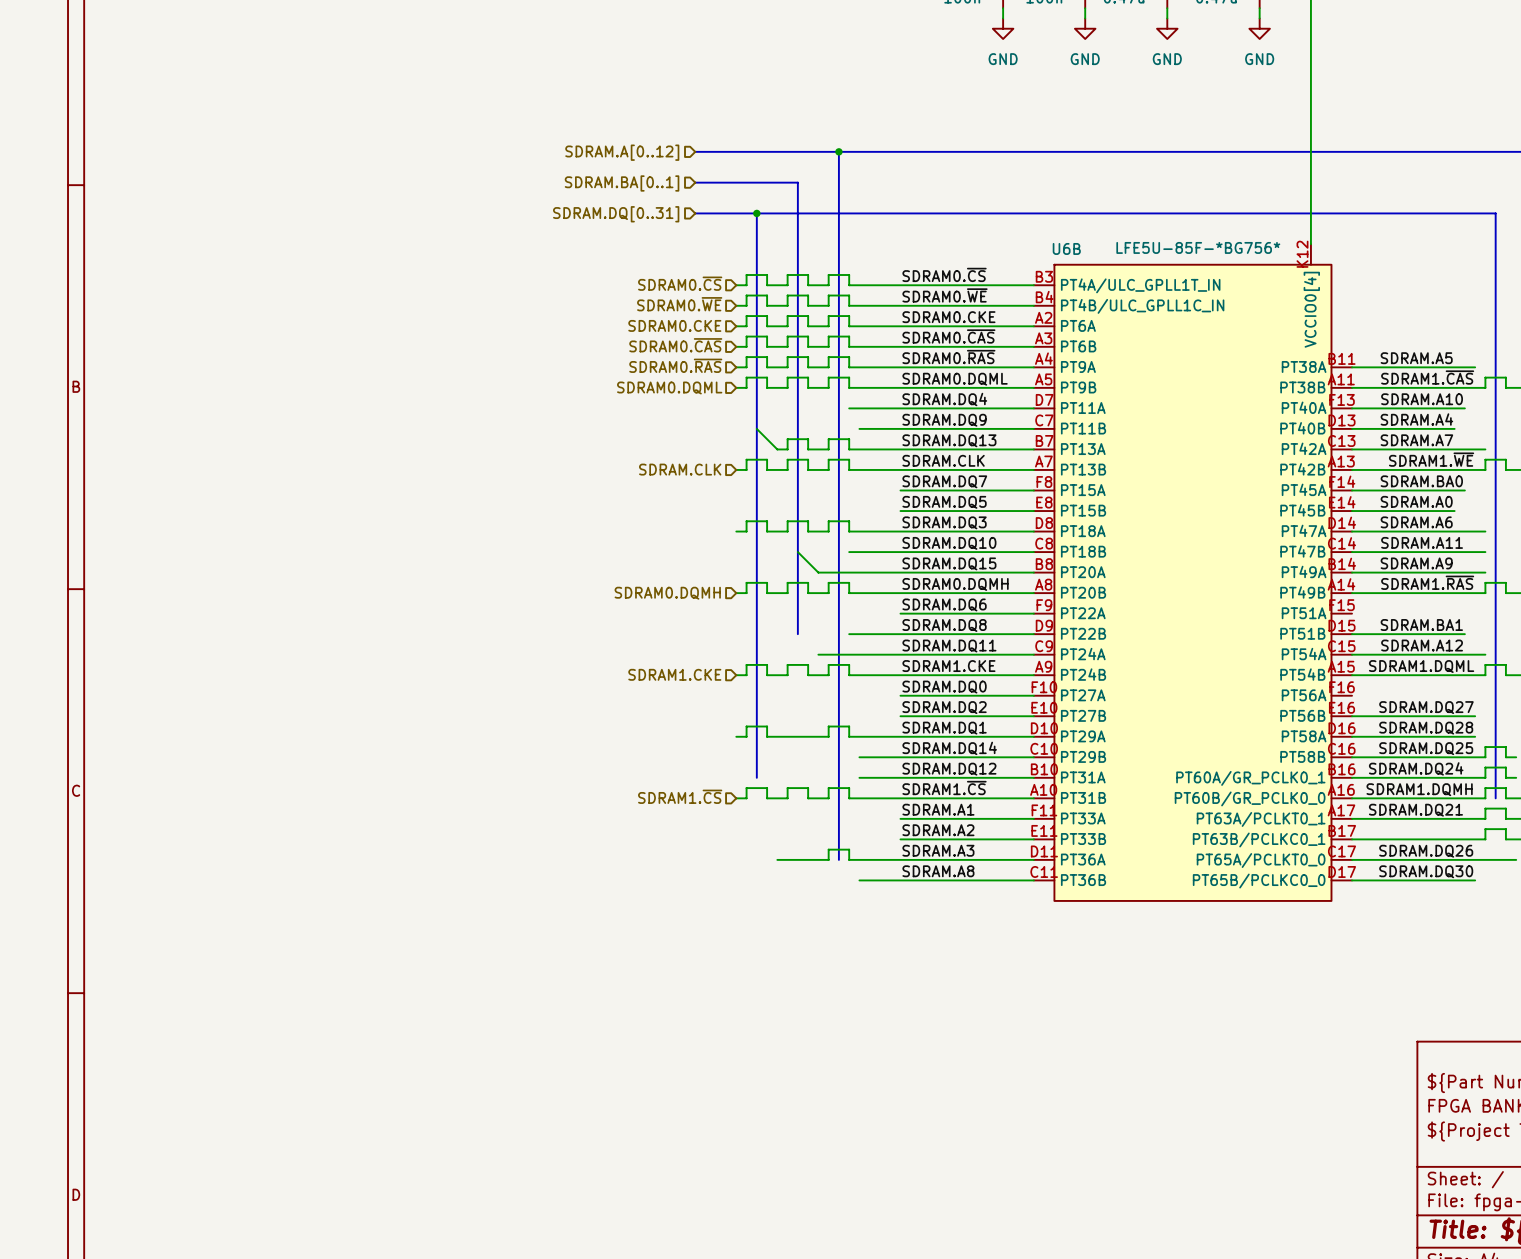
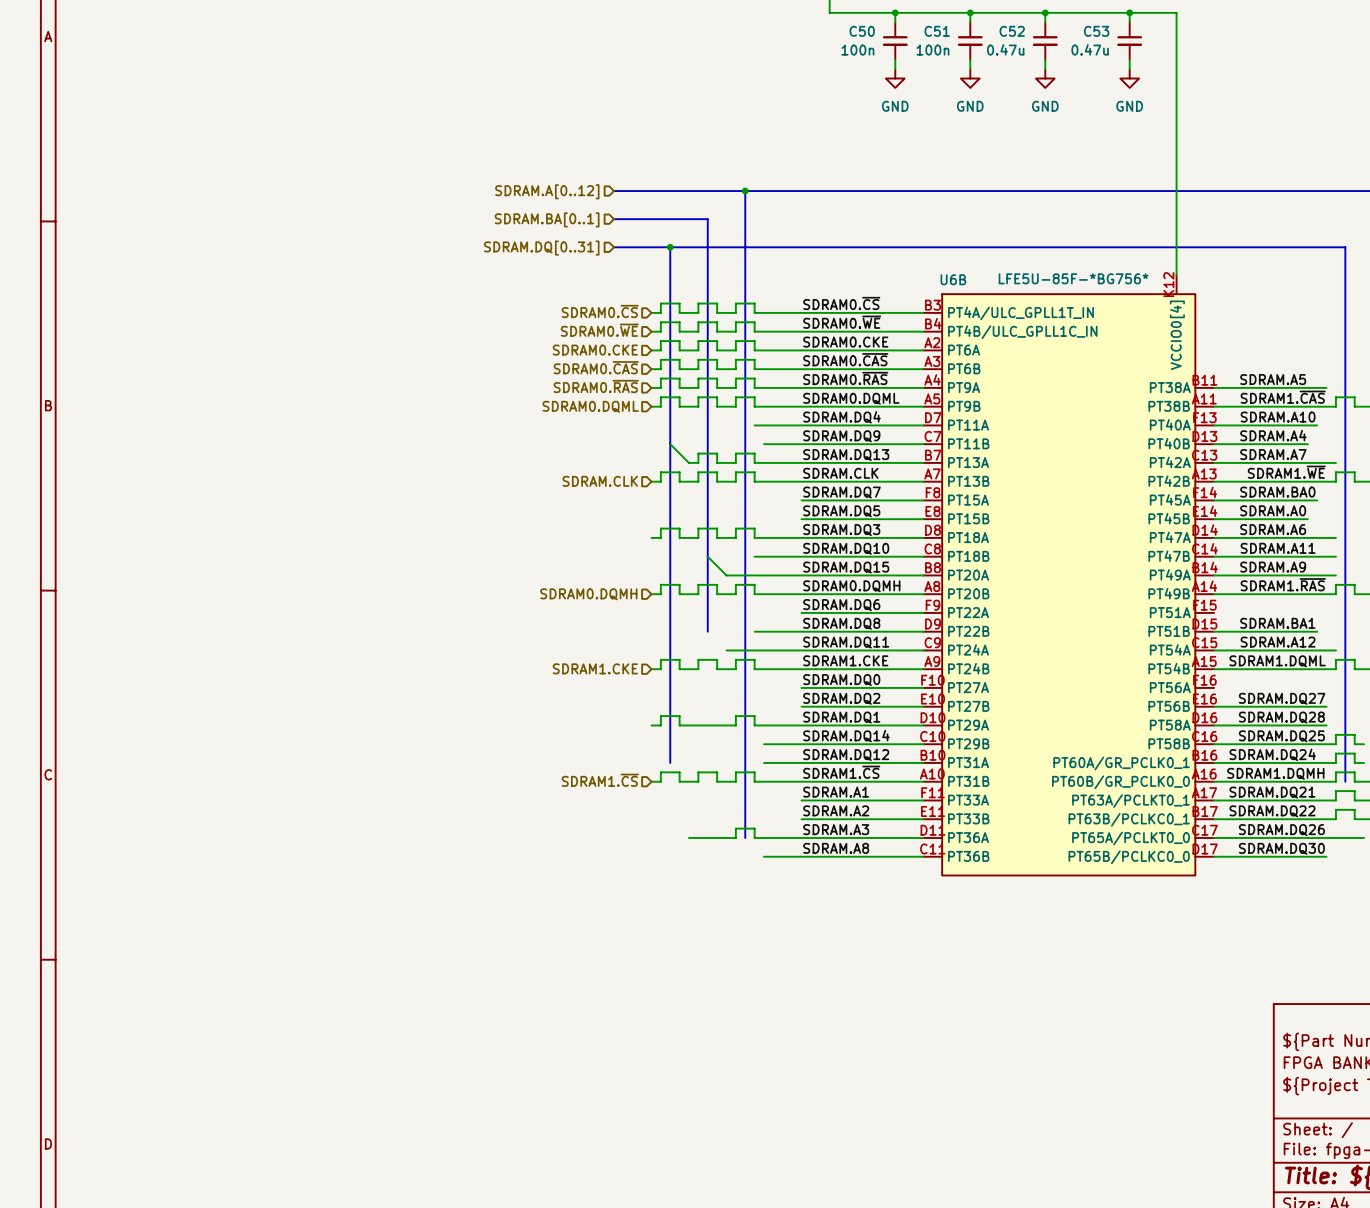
label: none -> SDRAM.DQ22 (1272, 811)

